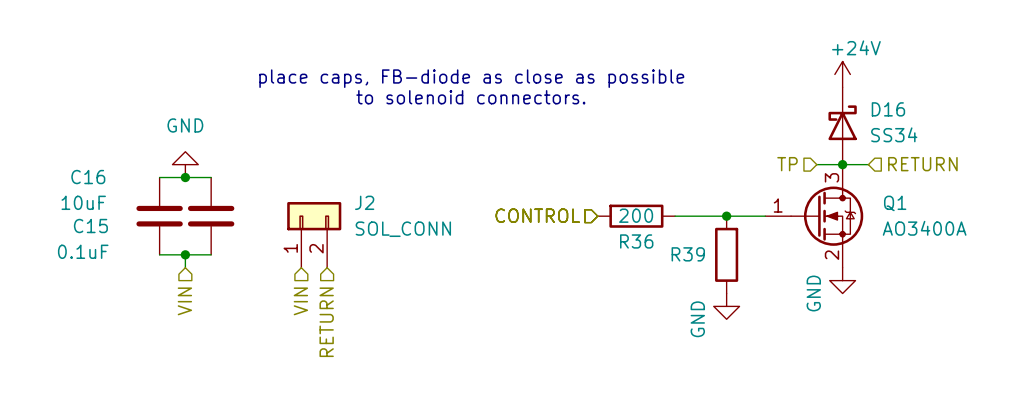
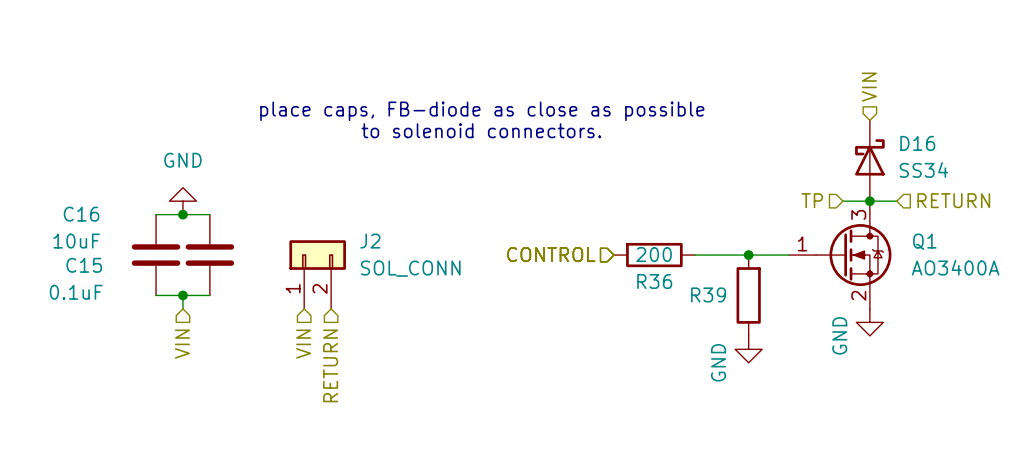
hierarchical label: none -> VIN (869, 87)
power symbol: +24V (842, 74) -> none

